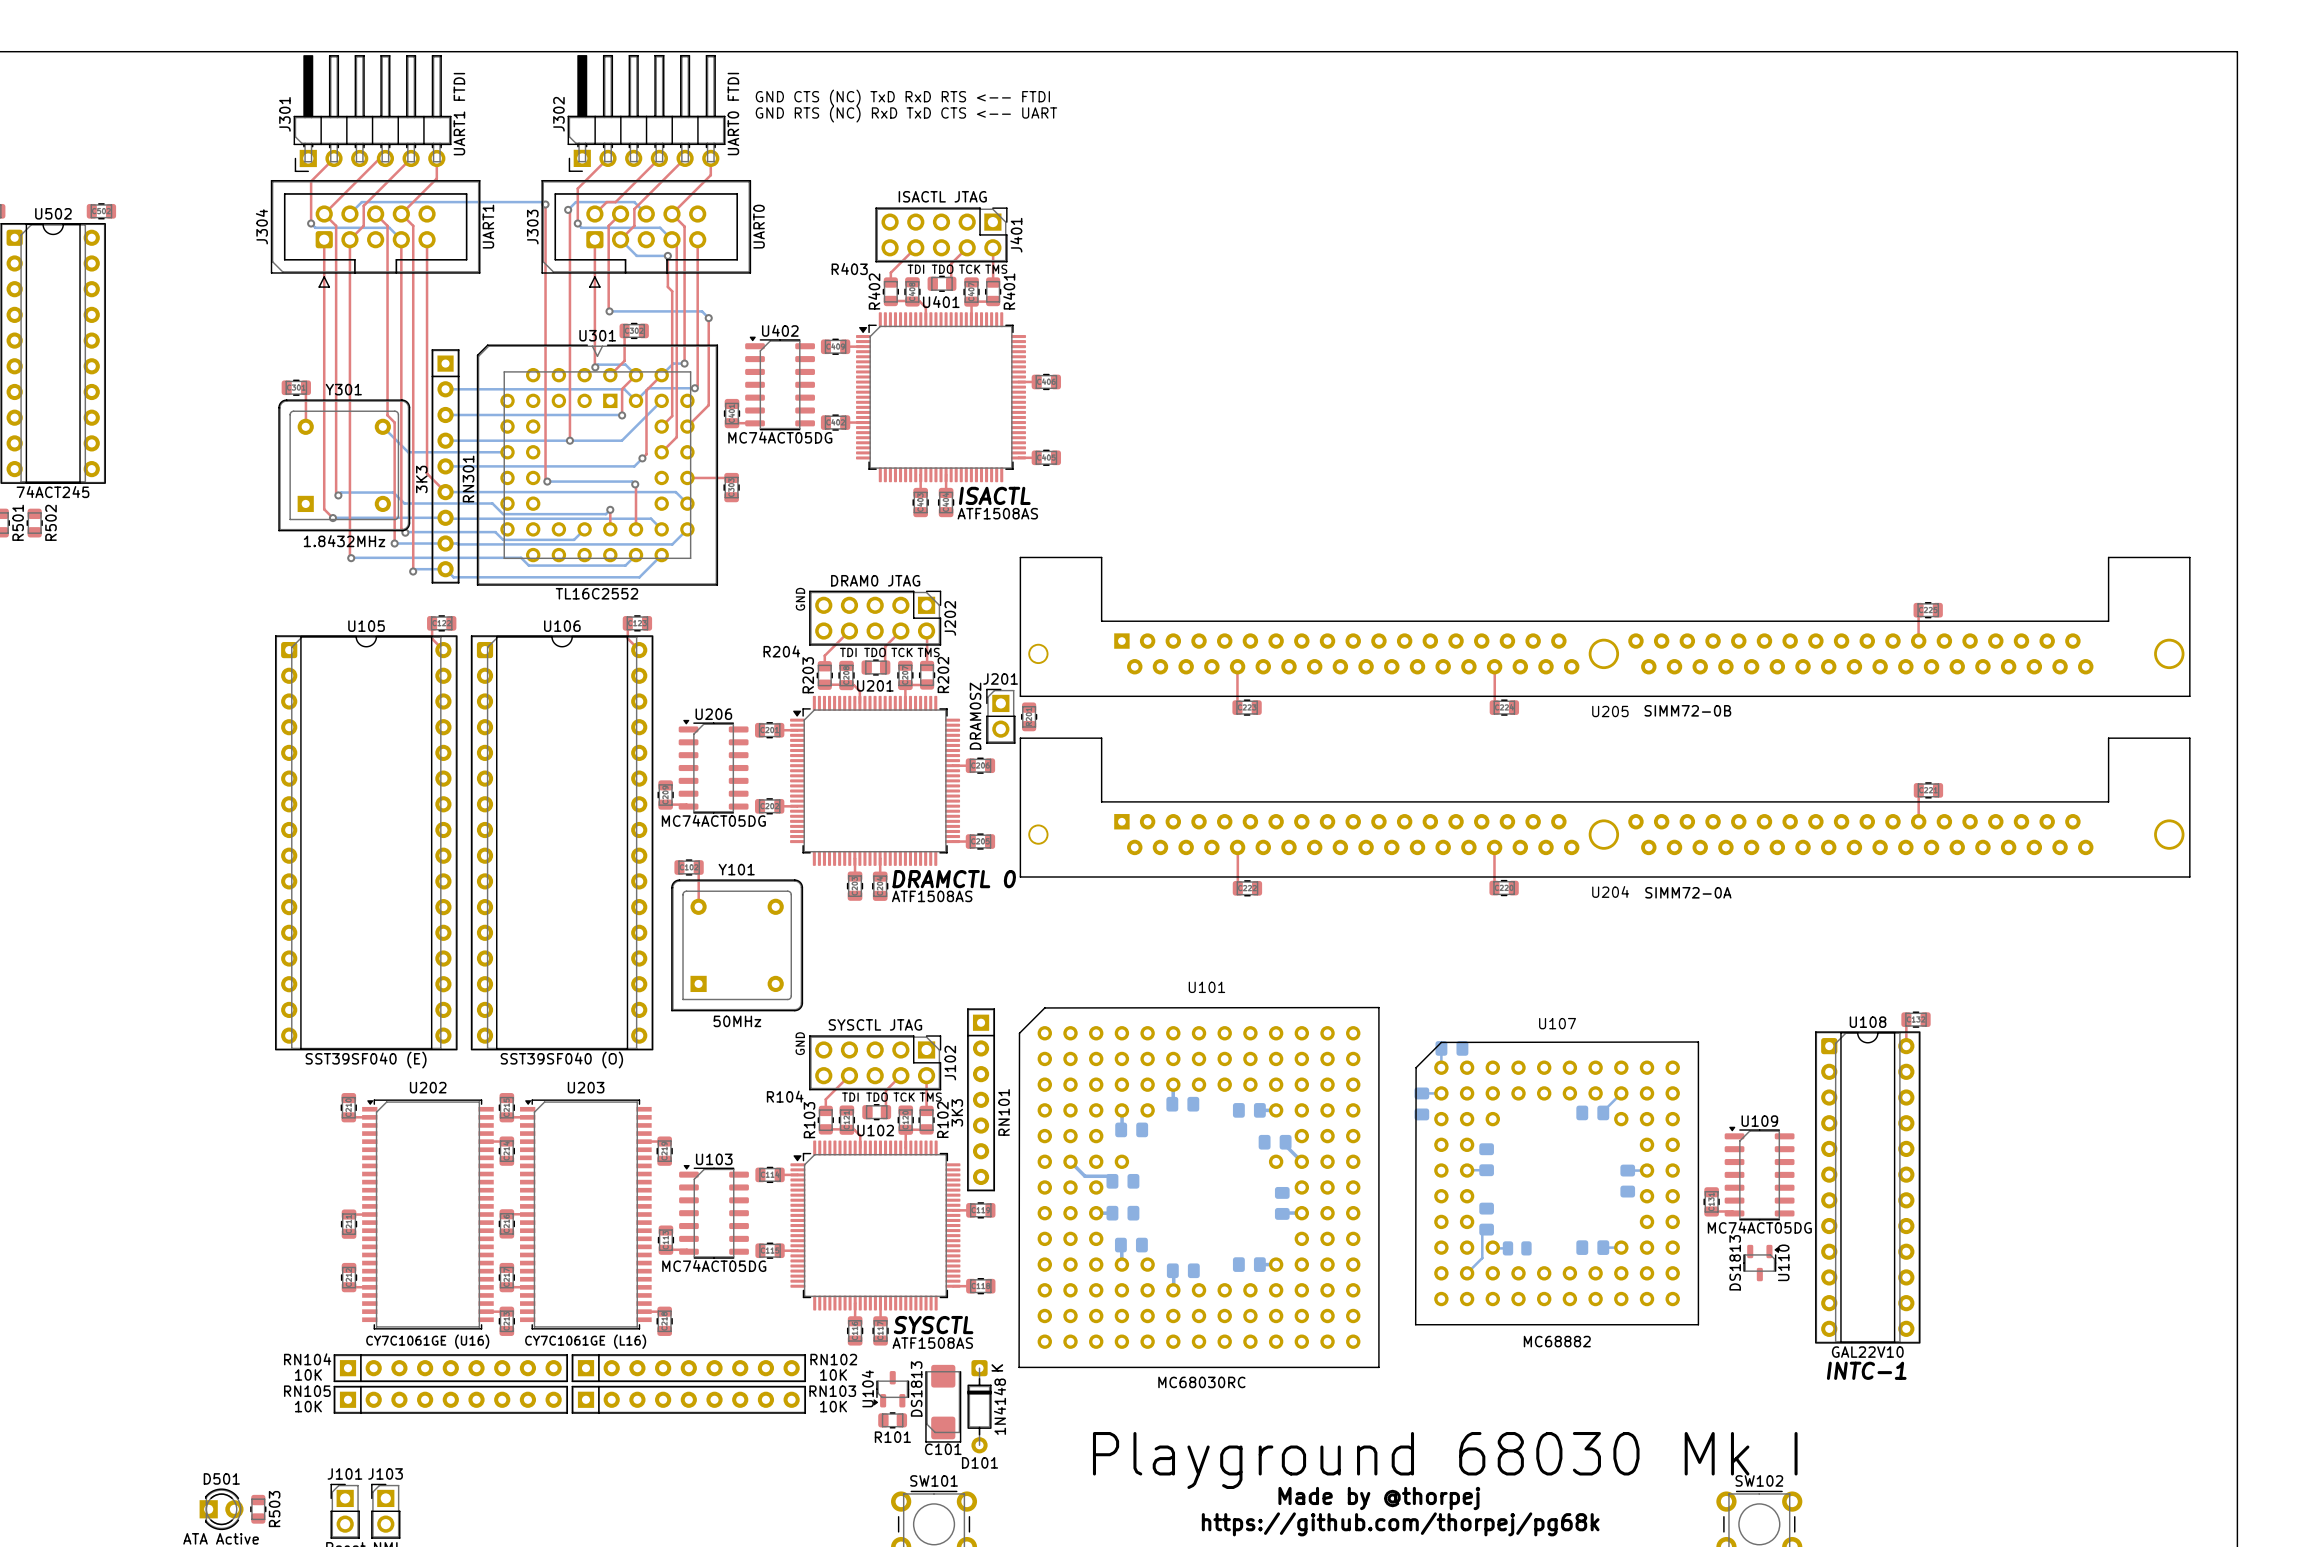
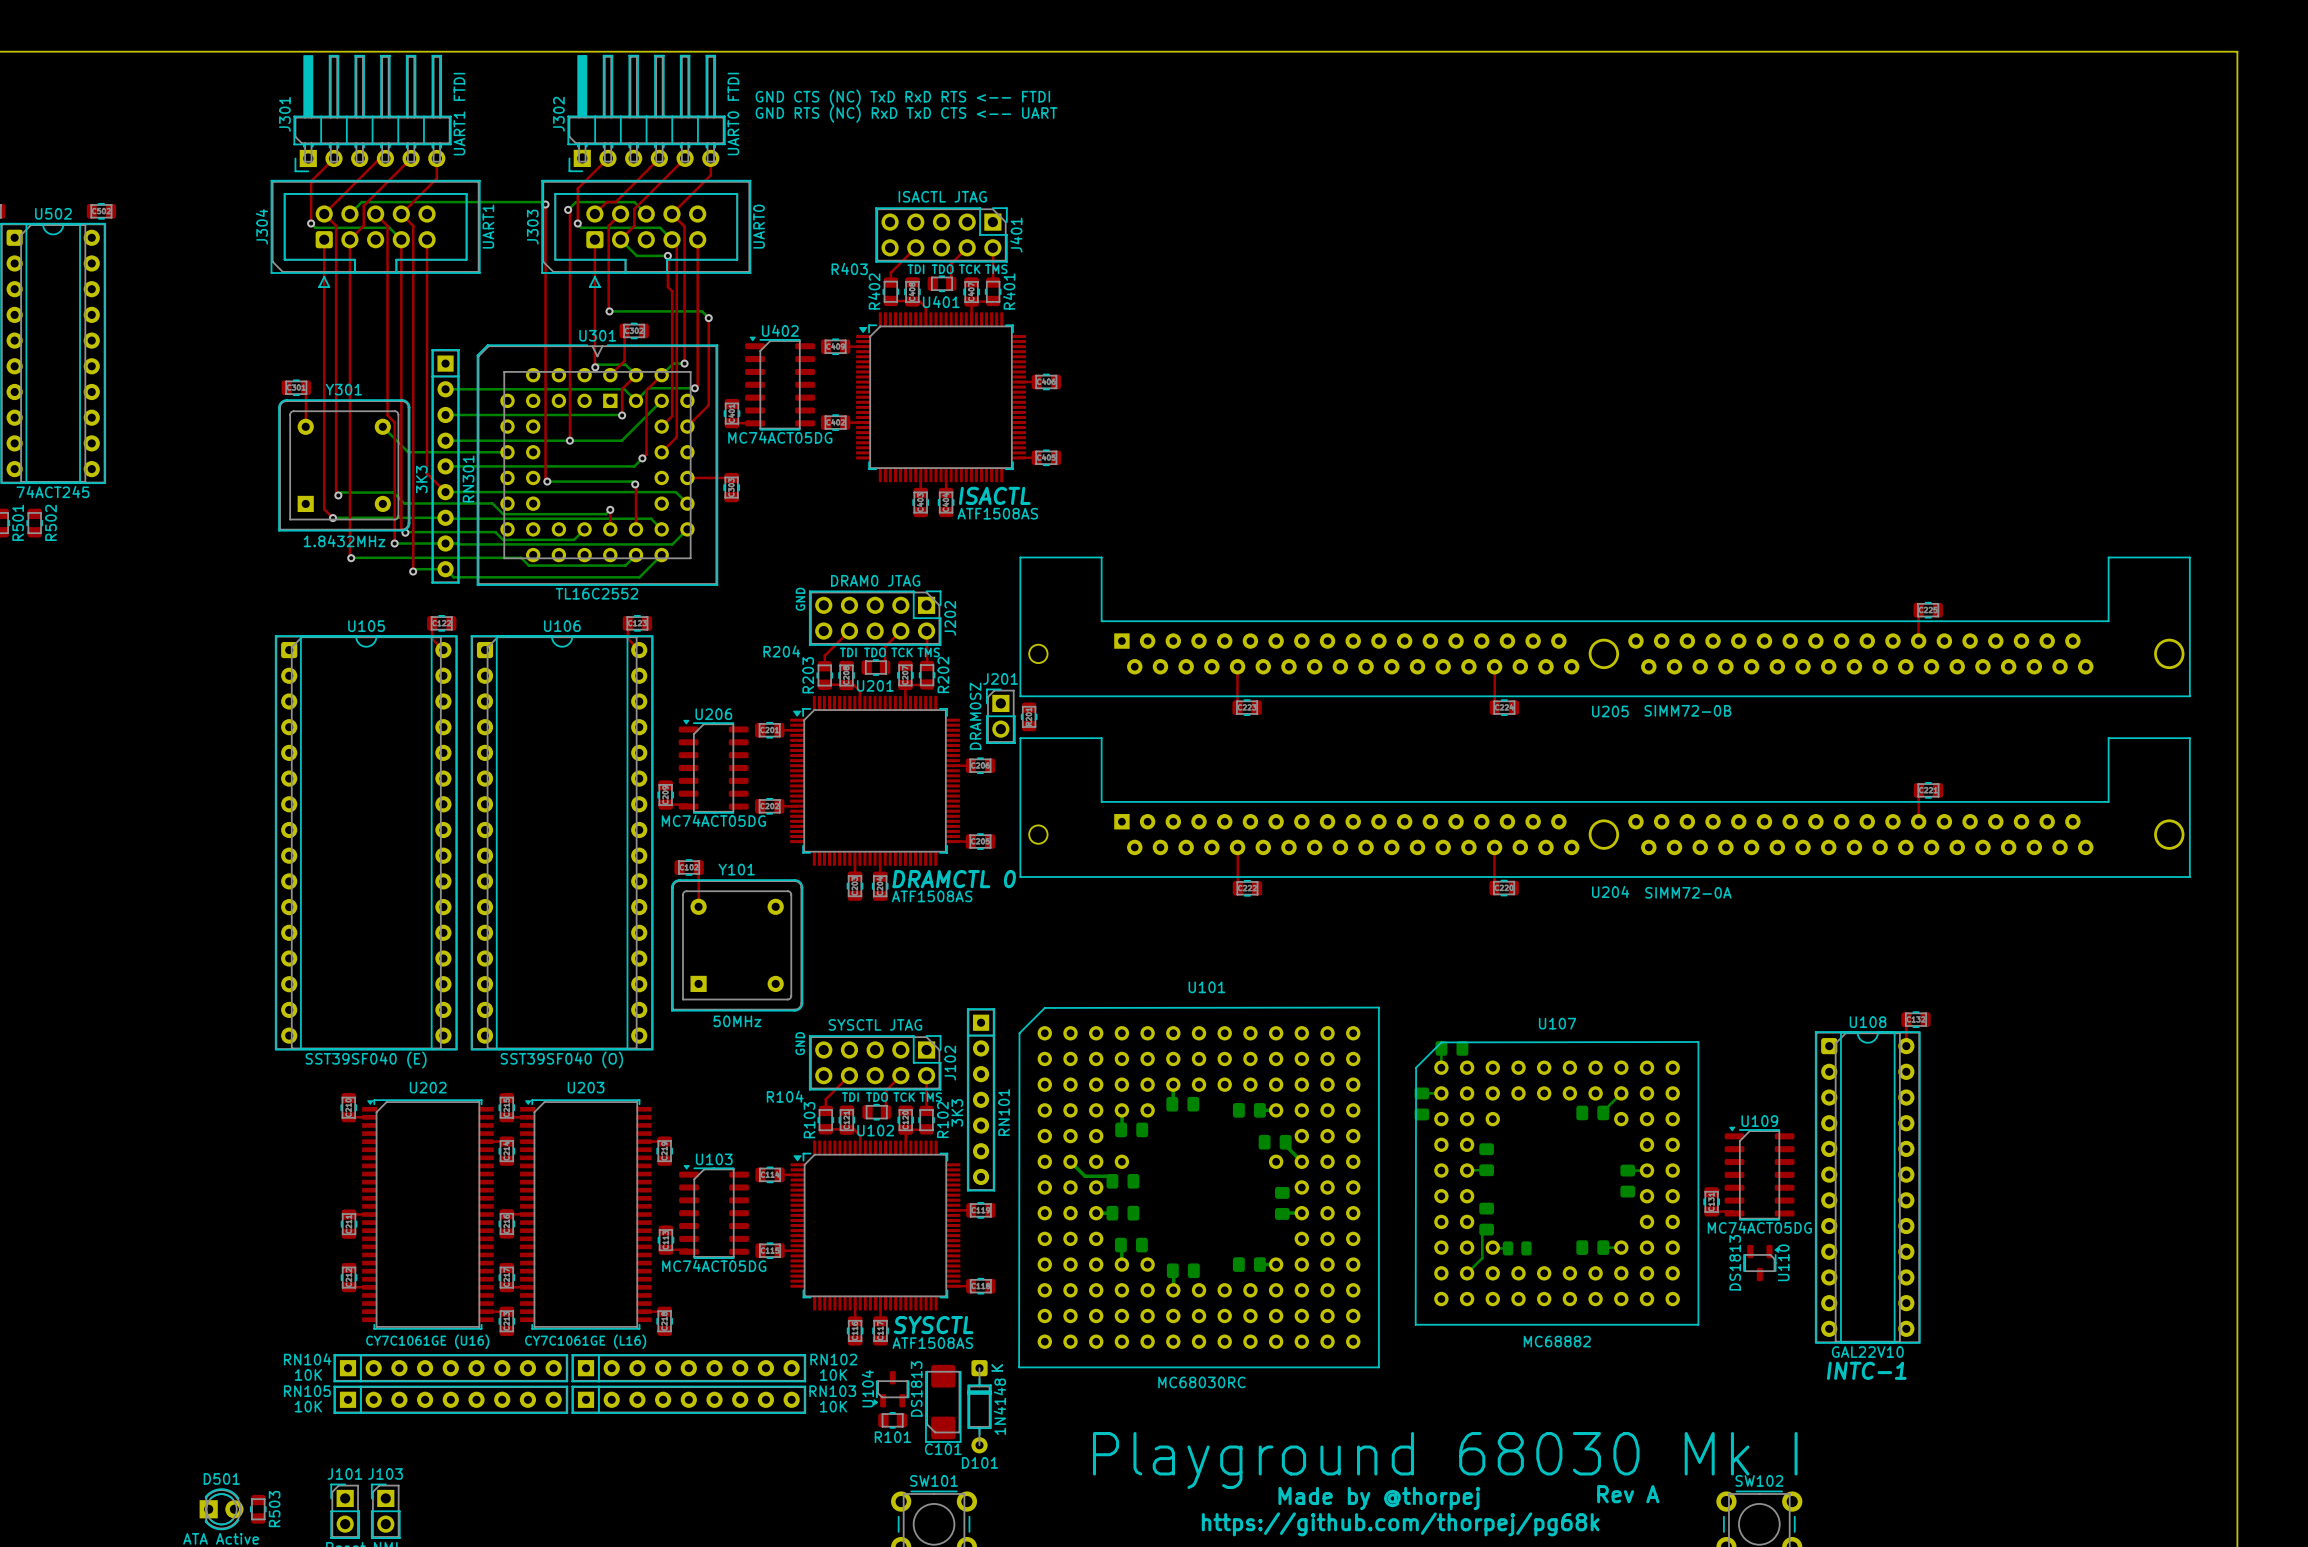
text: none -> Rev A (1628, 1494)

